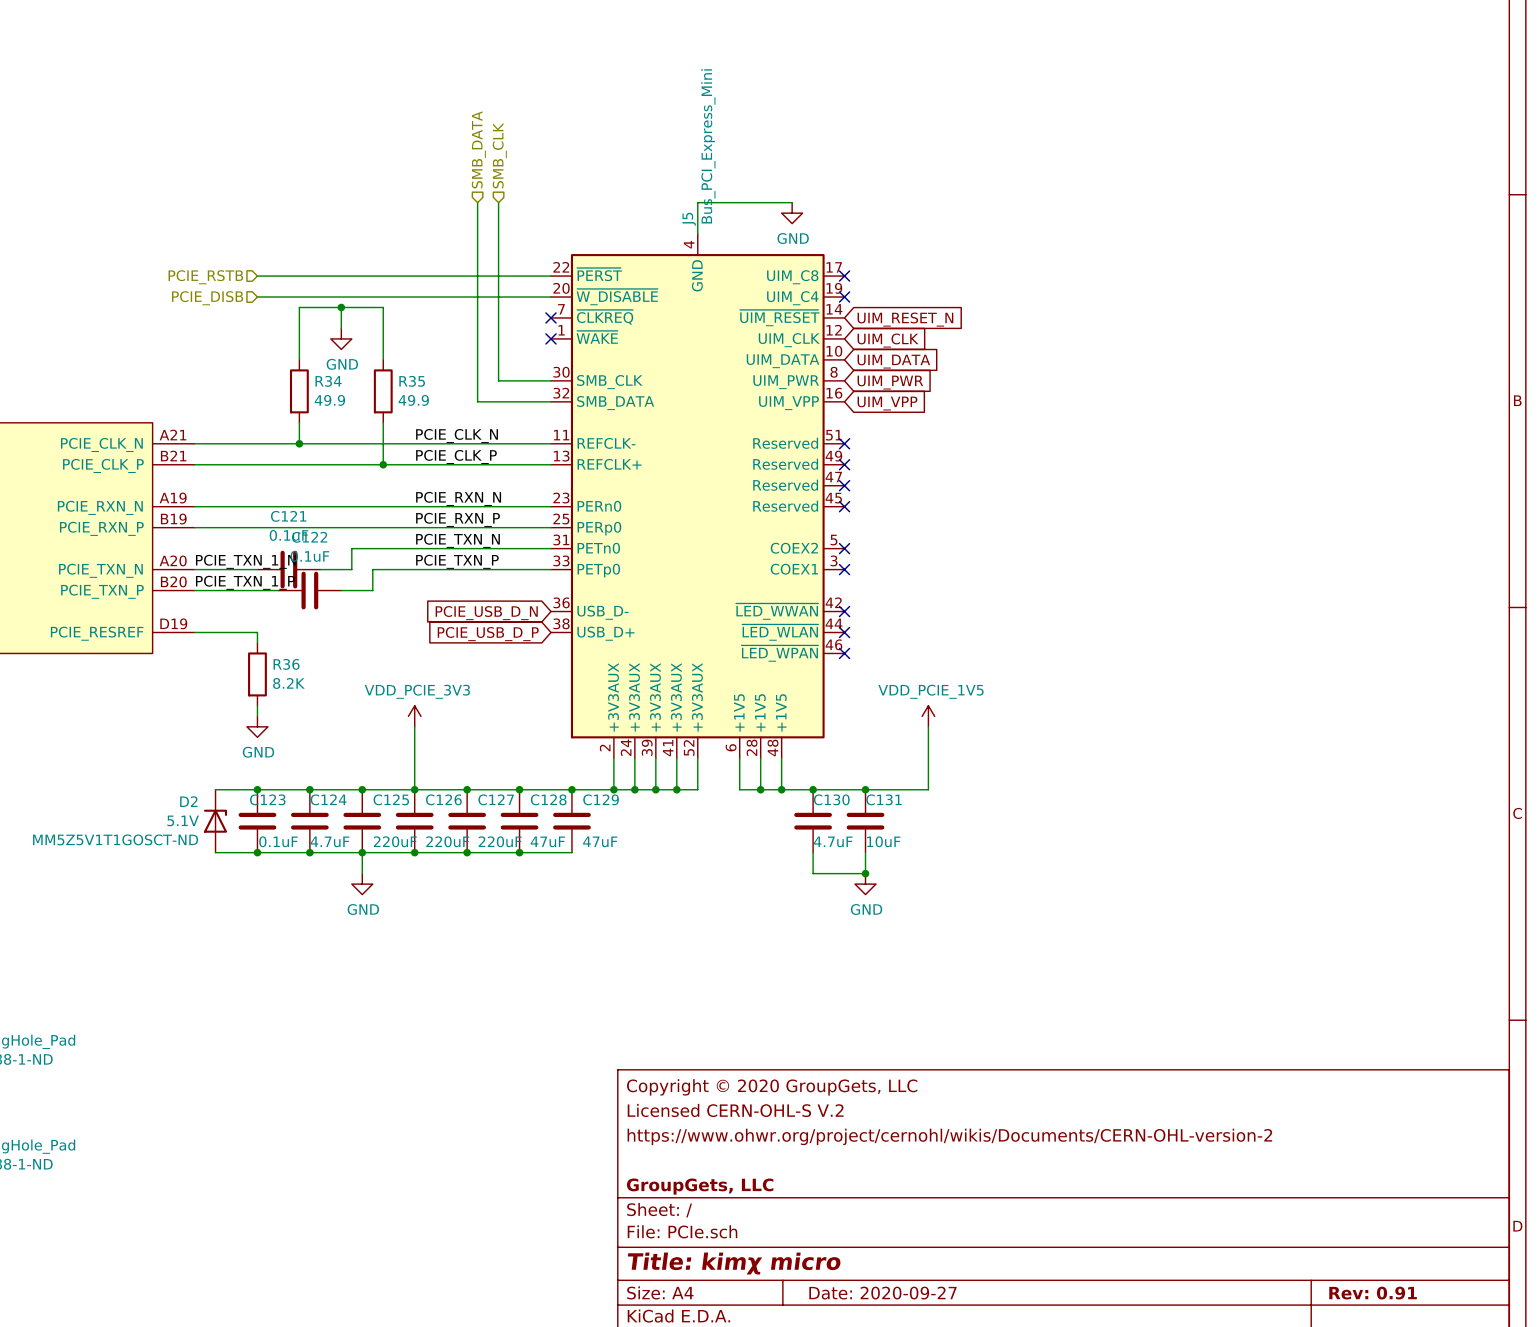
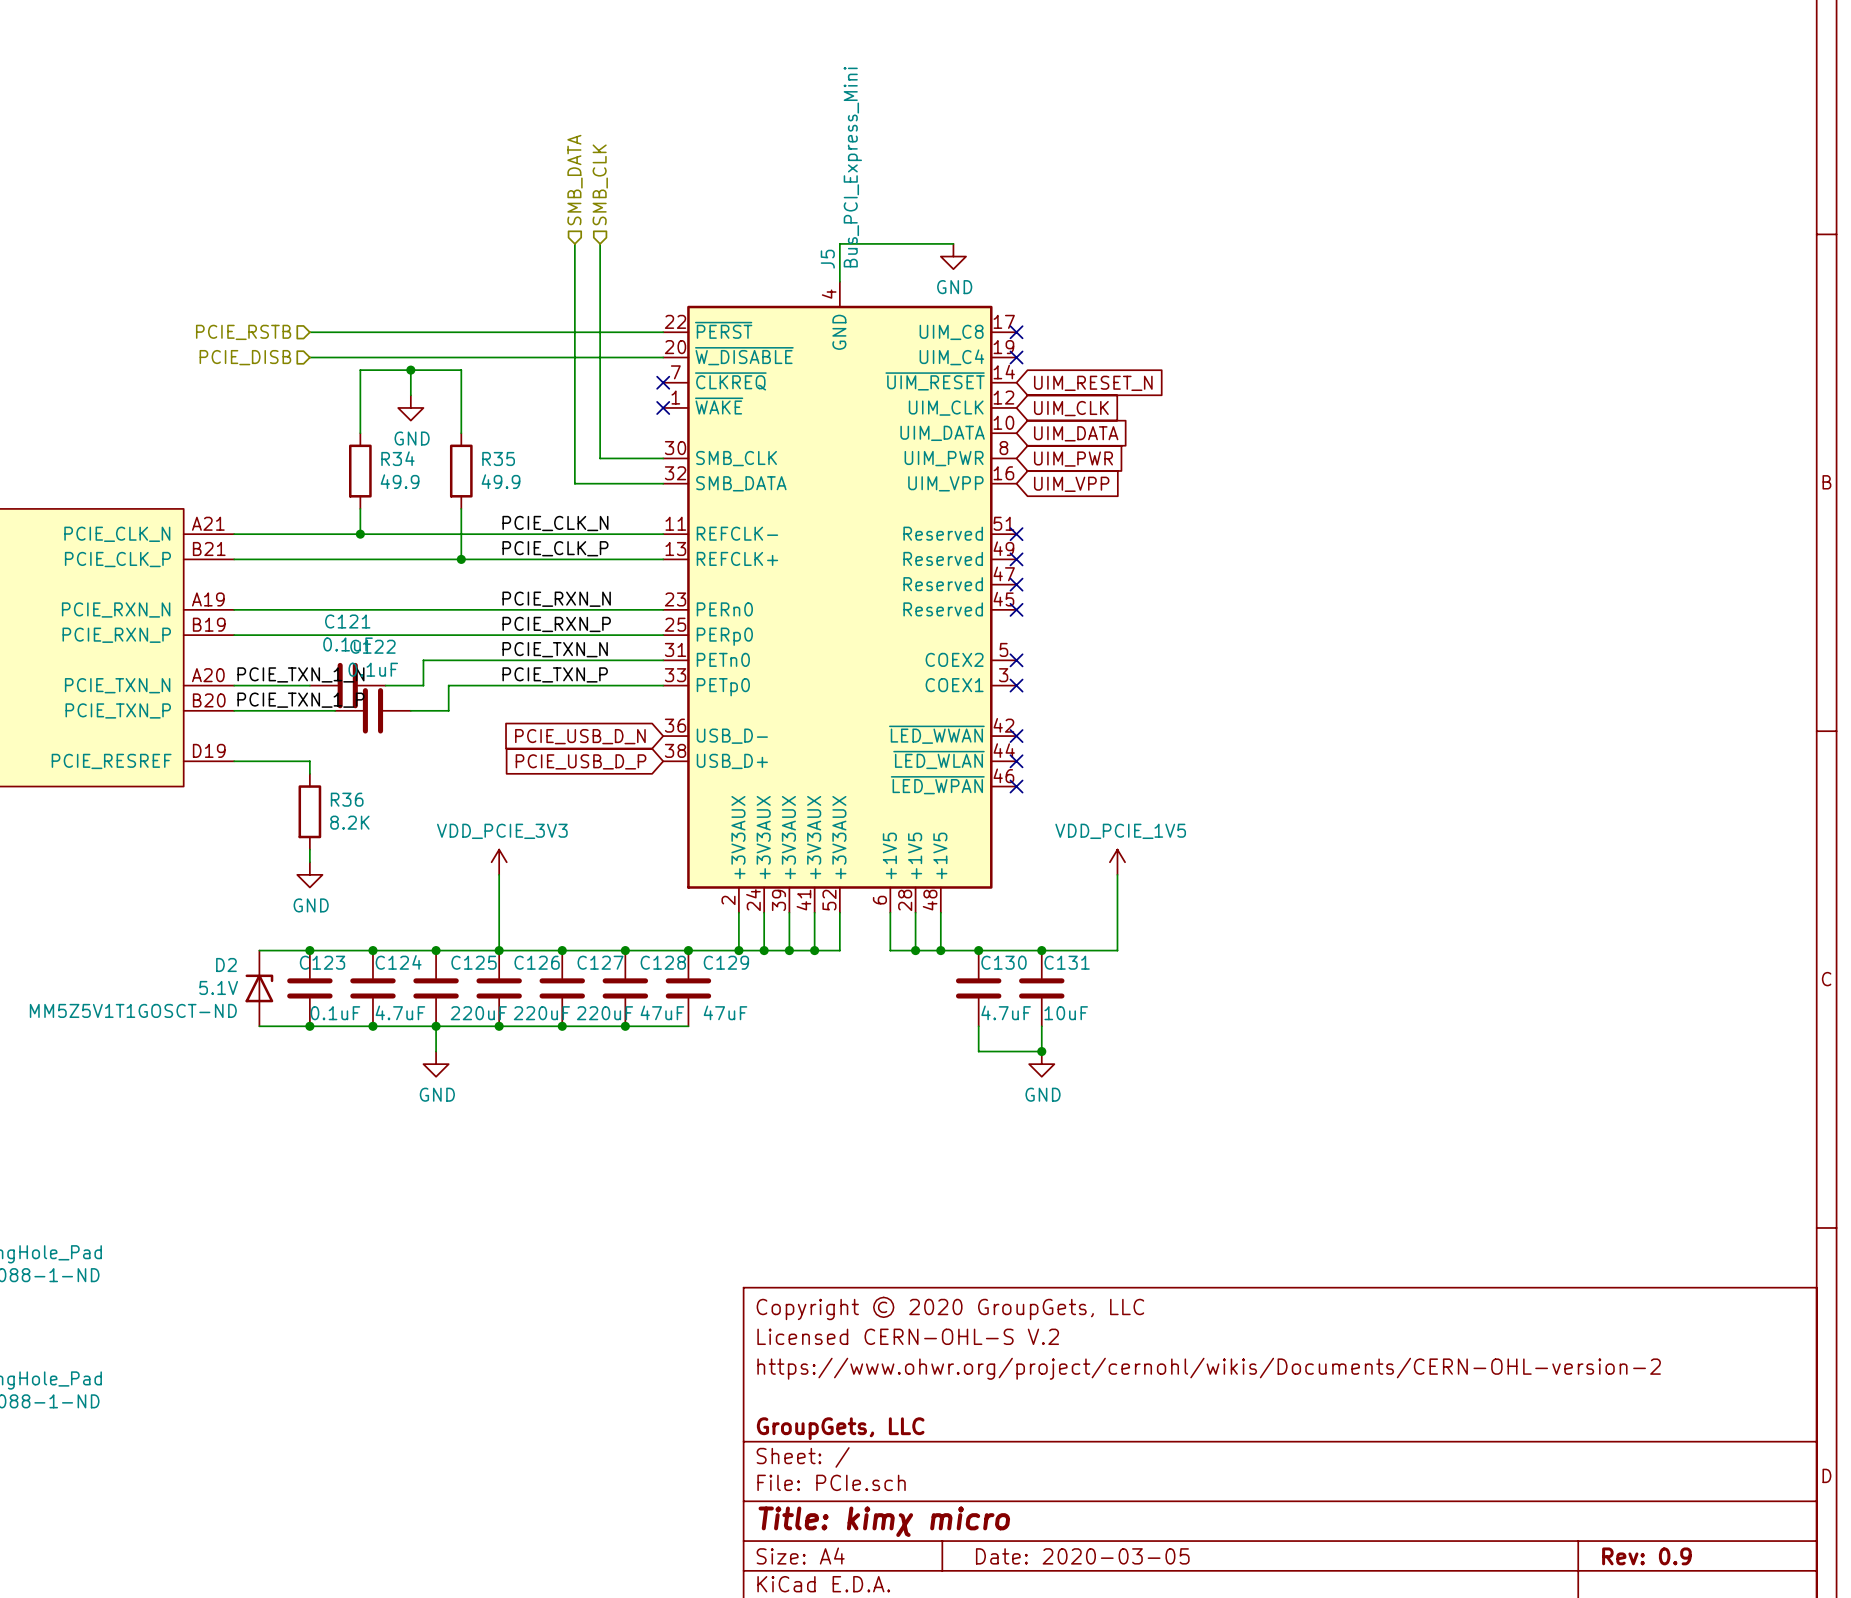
title block: Date: 2020-09-27 (882, 1293) -> Date: 2020-03-05 (1082, 1556)
title block: Rev: 0.91 (1373, 1293) -> Rev: 0.9 (1646, 1556)

